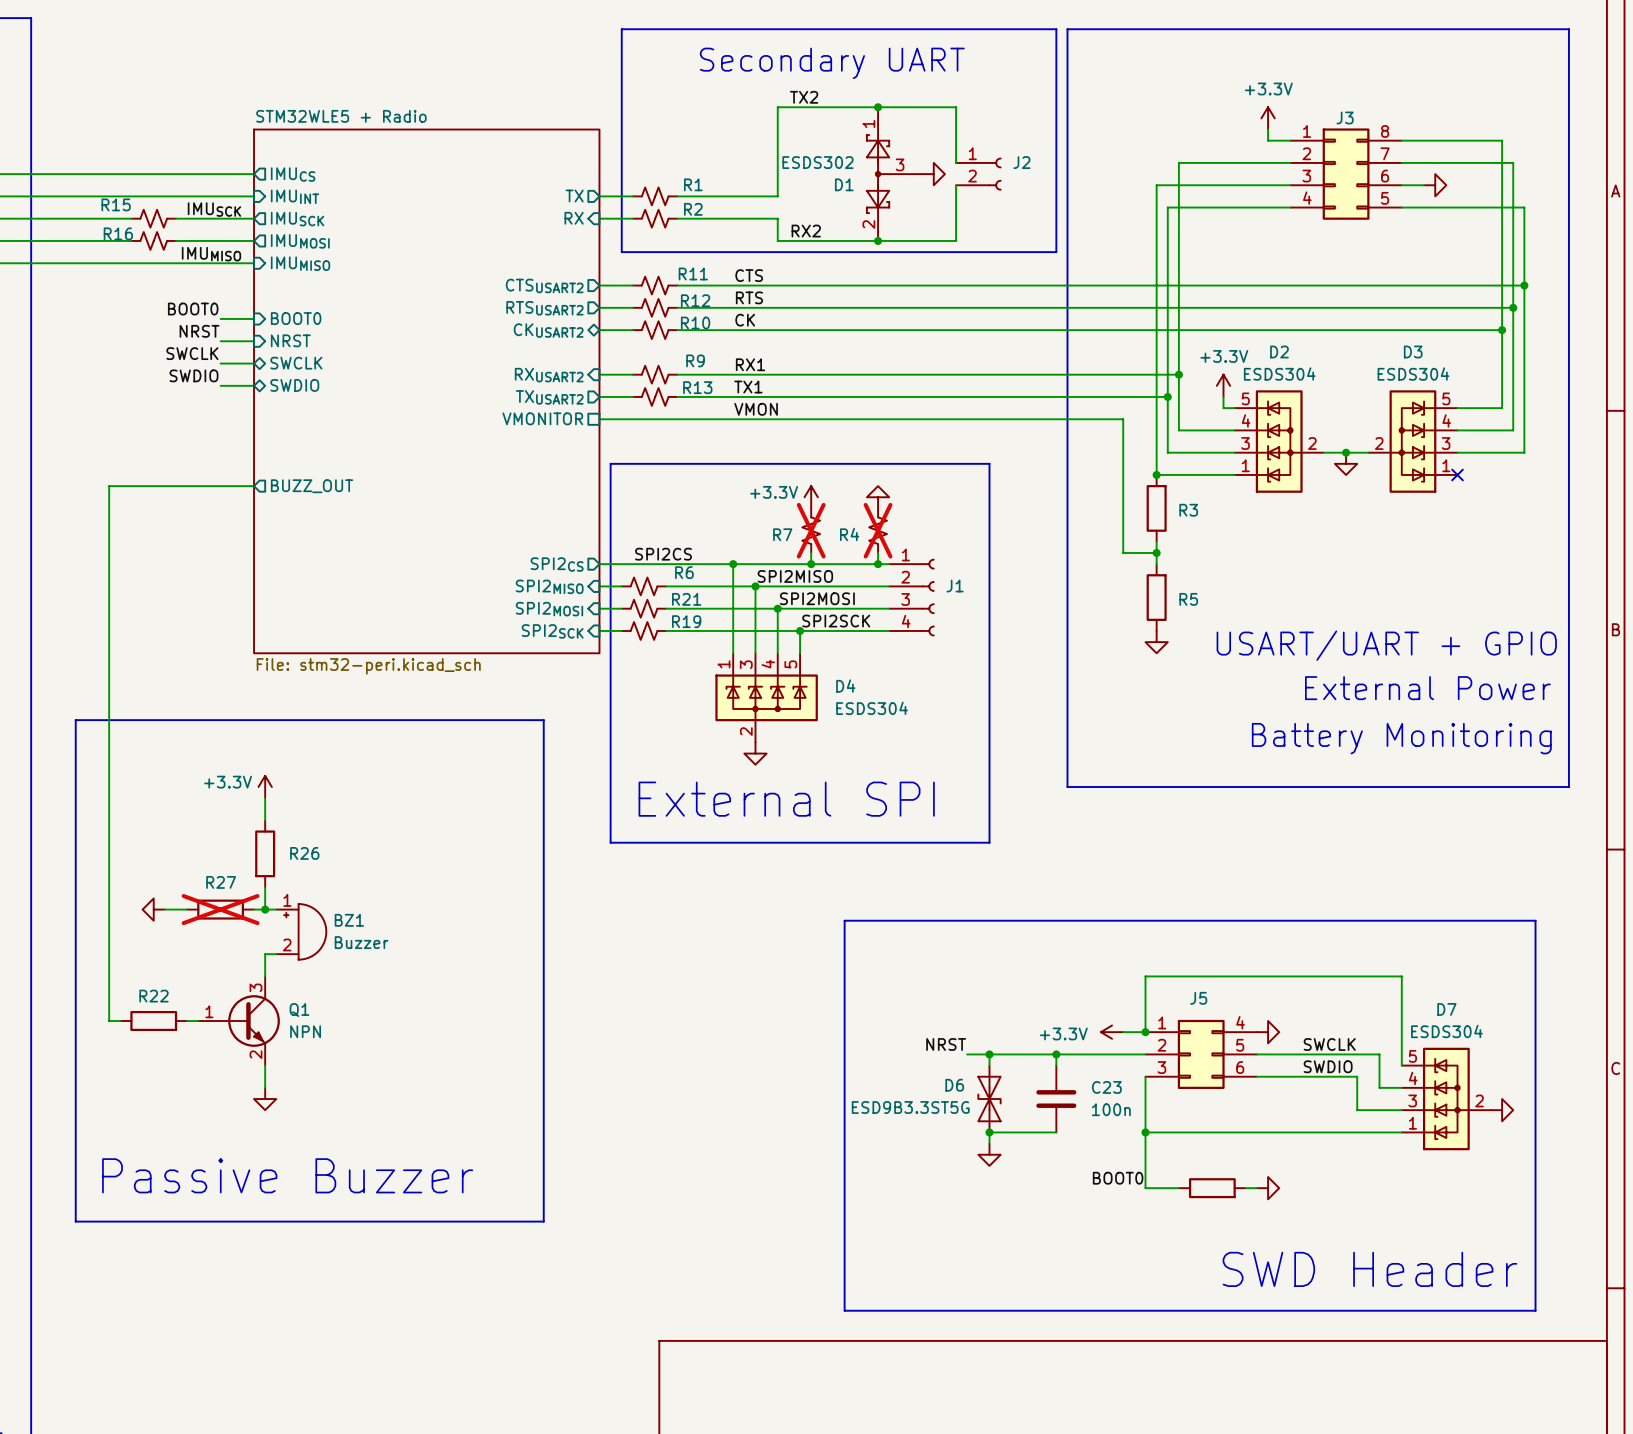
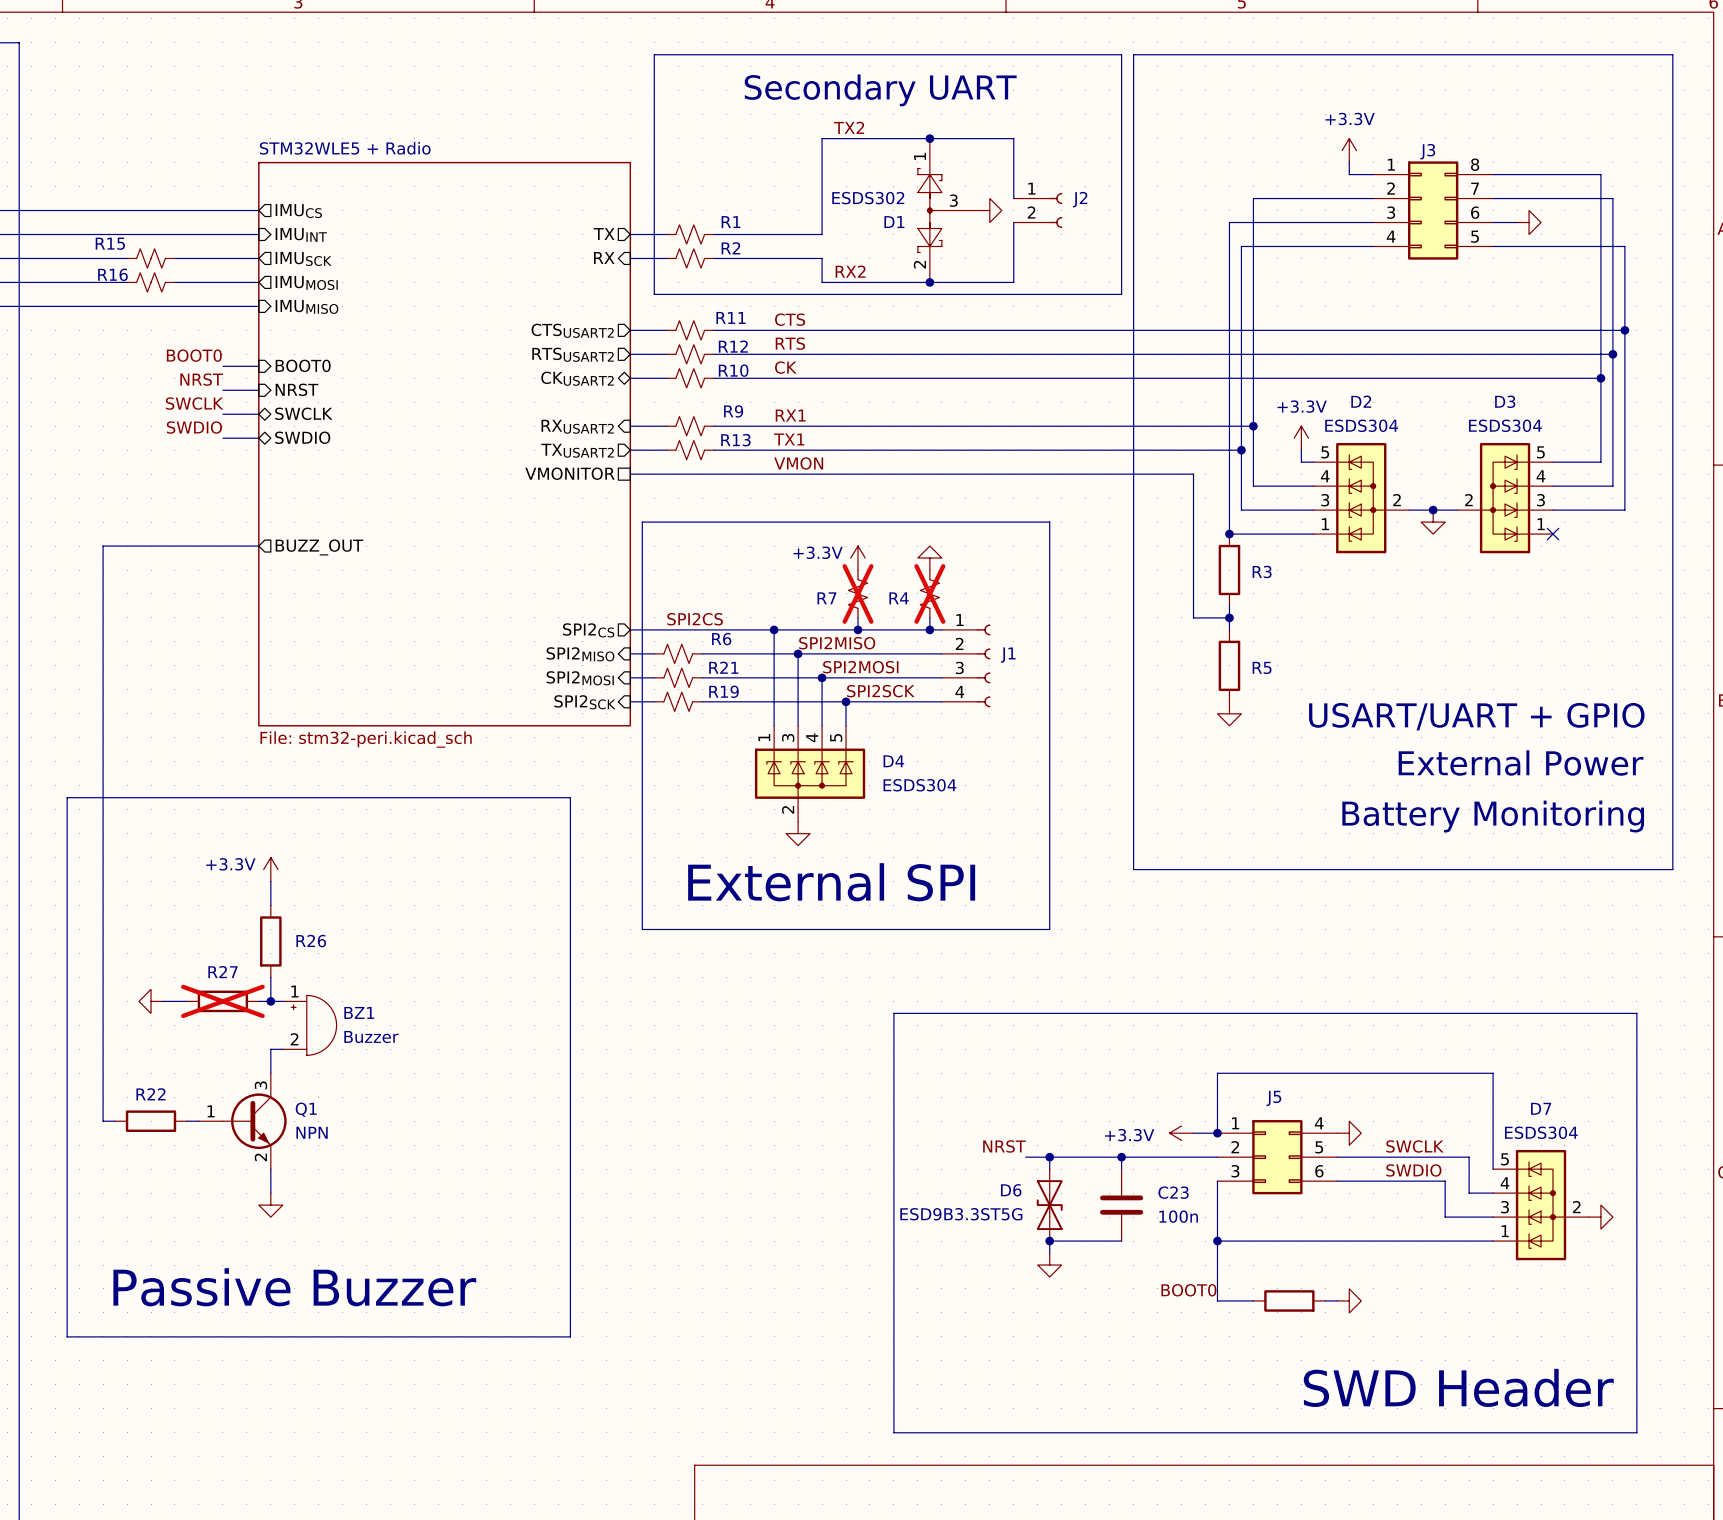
label: IMUSCK (214, 209) -> none
label: IMUMISO (211, 254) -> none

